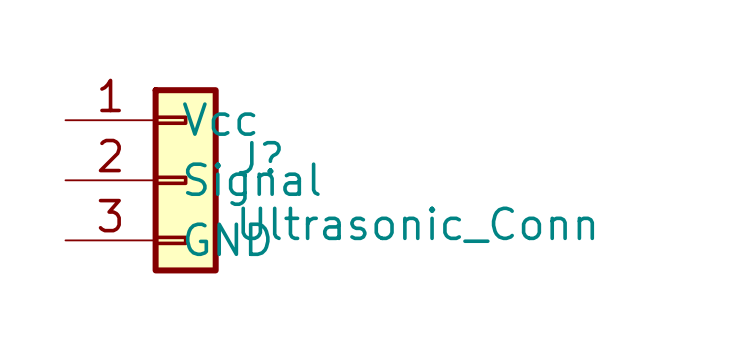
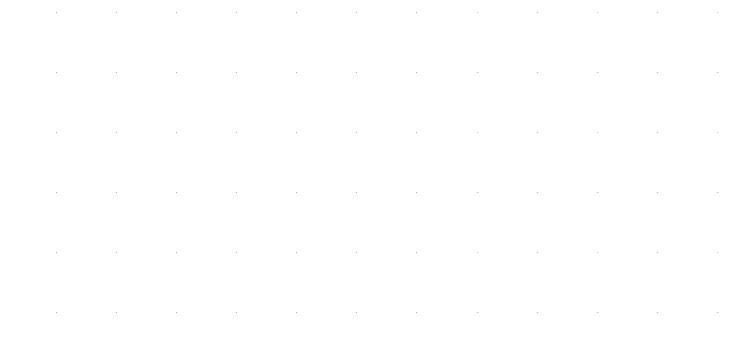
J?: Ultrasonic_Conn (142, 180) -> none

